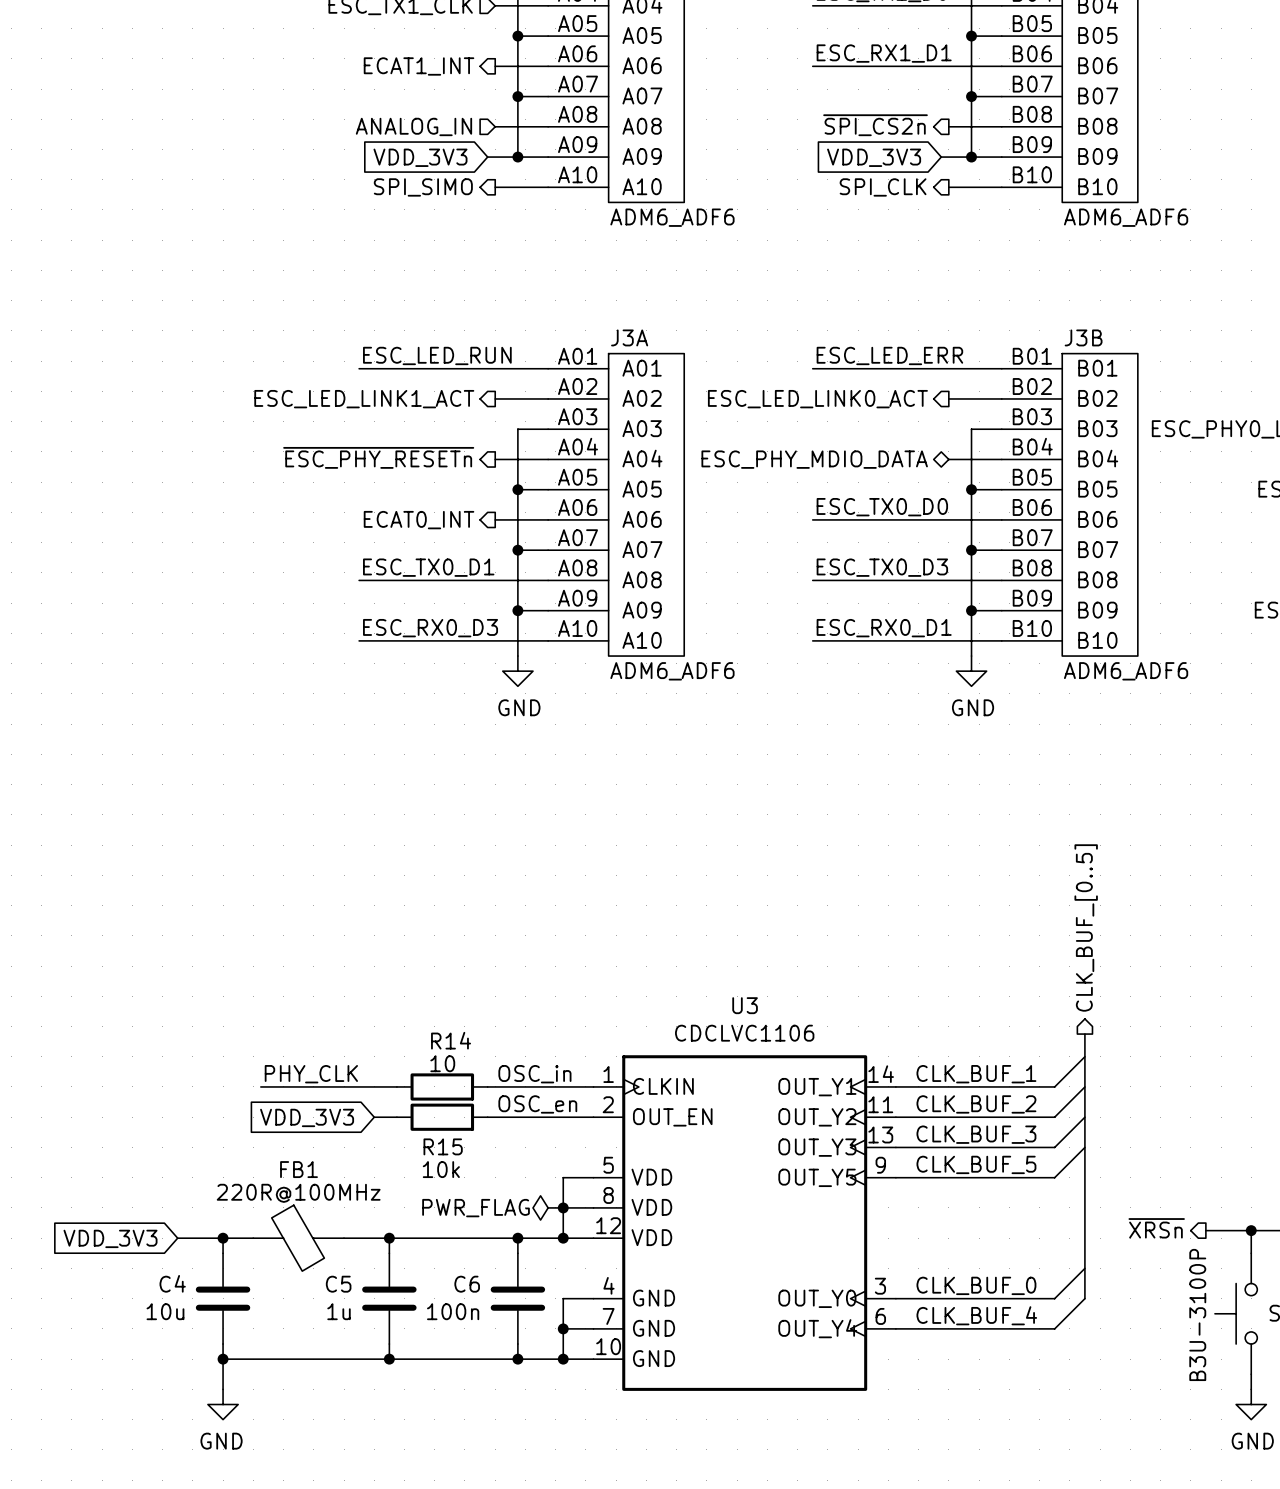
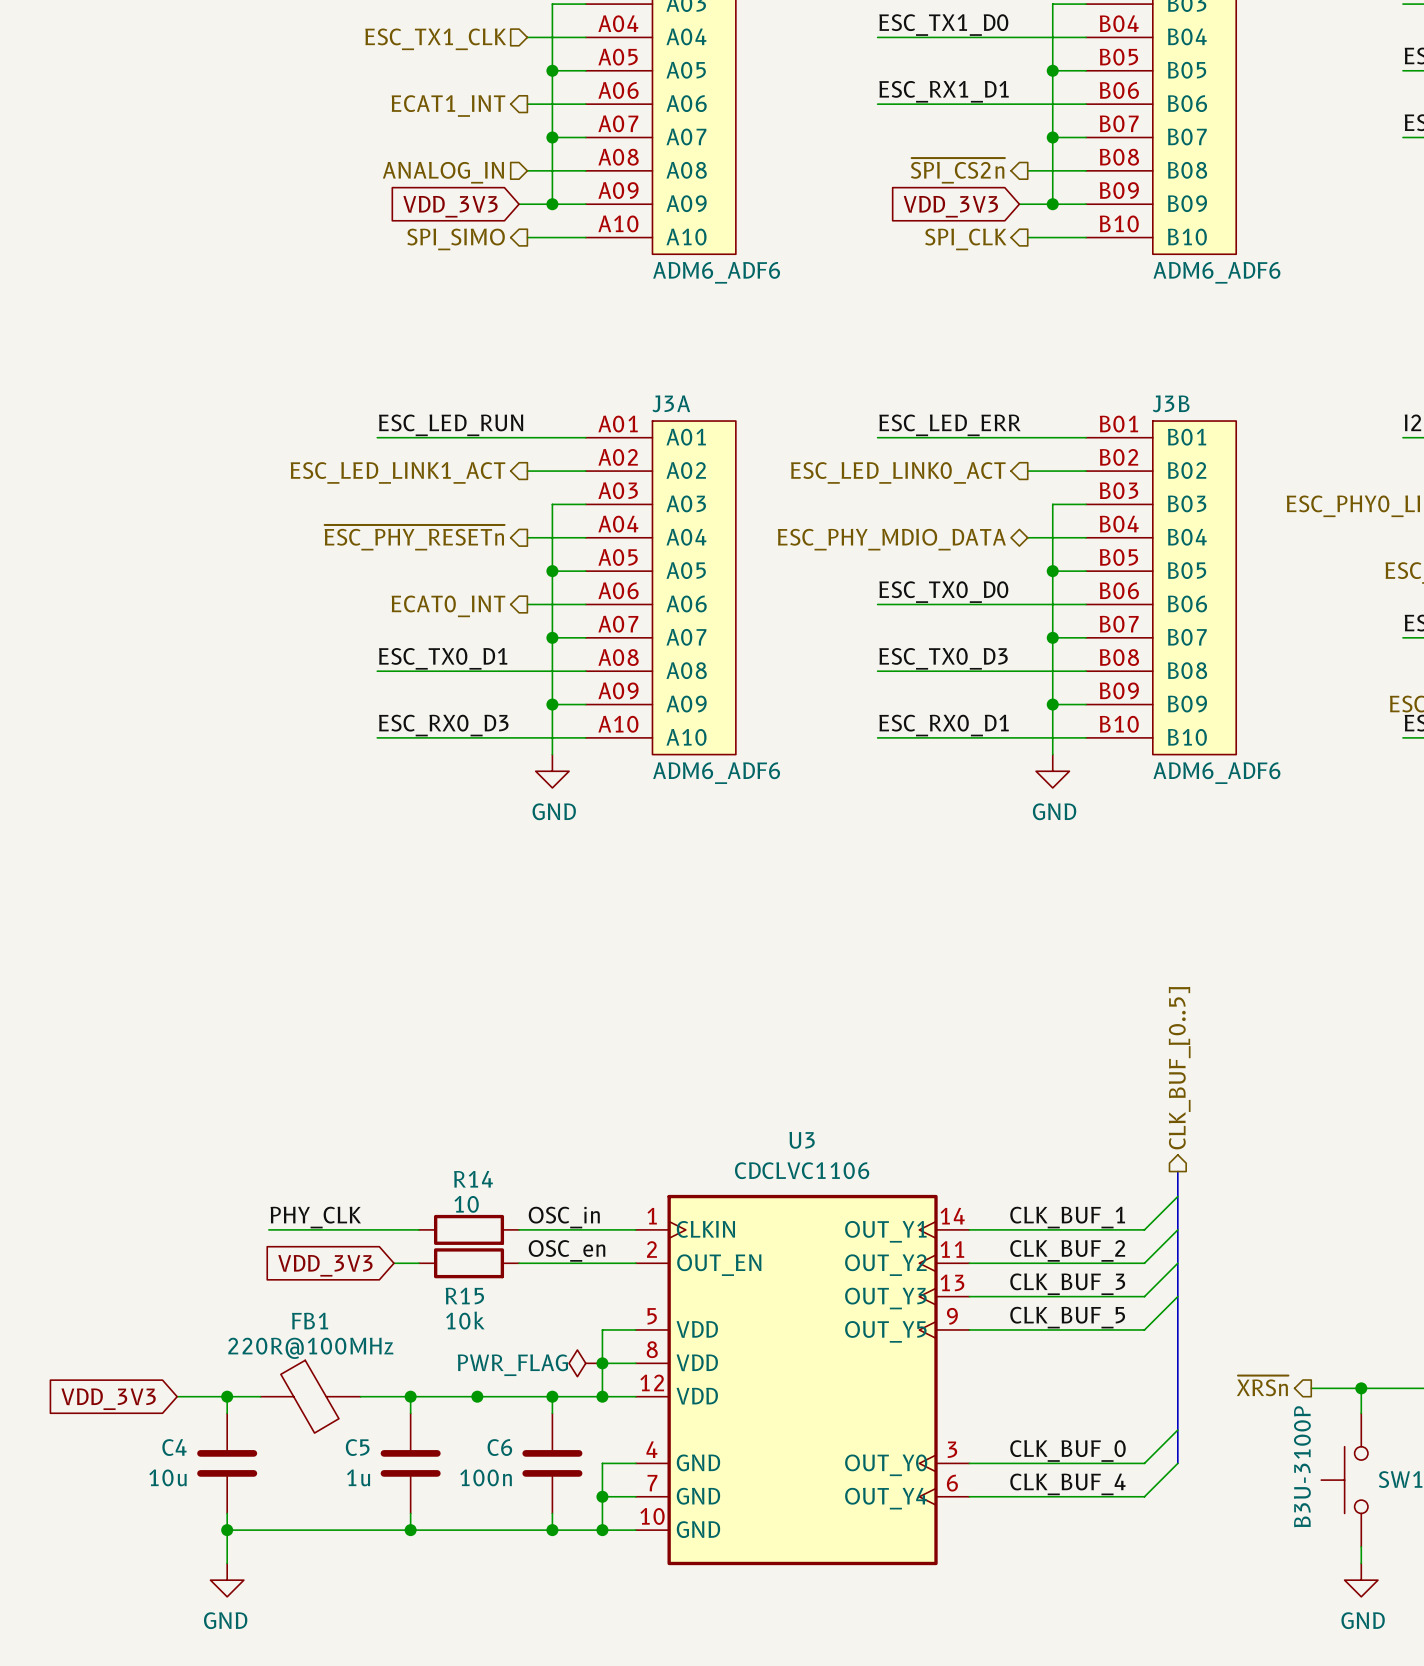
junction: none -> (477, 1396)

